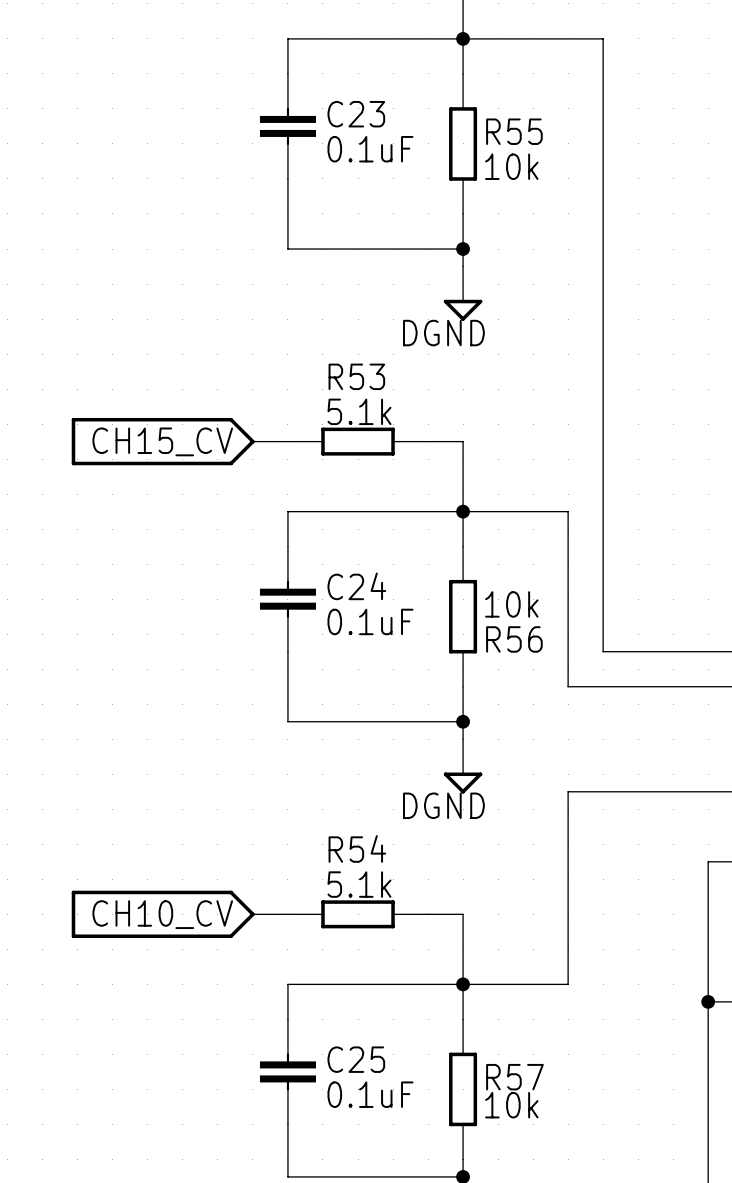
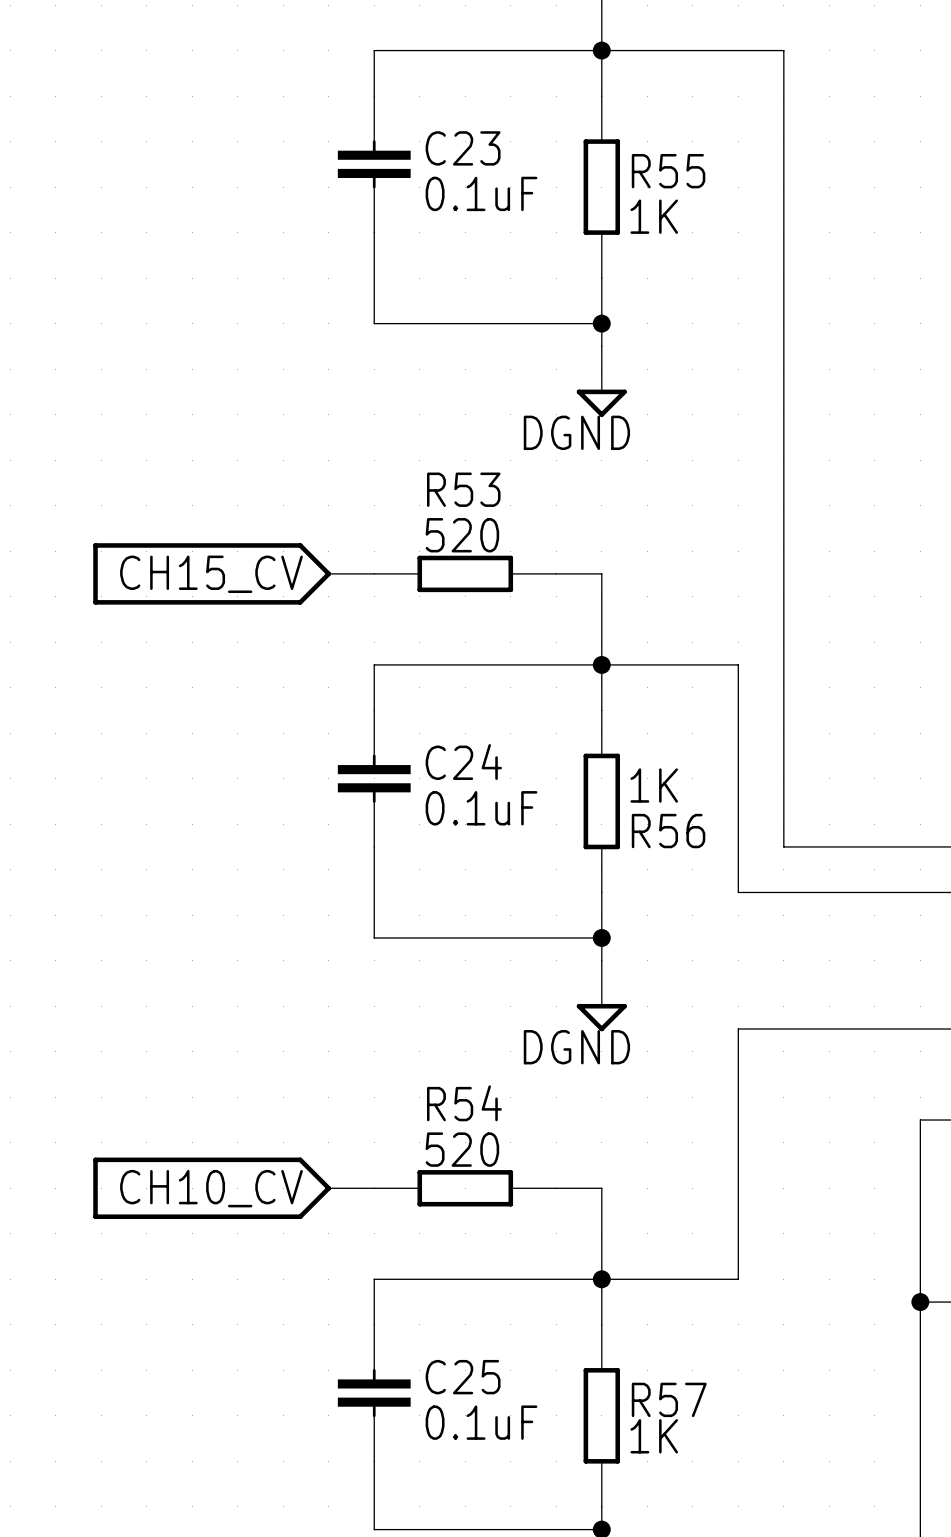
R55 value: 10k (511, 166) -> 1K (654, 216)
R53 value: 5.1k (359, 411) -> 520 (462, 535)
R56 value: 10k (511, 604) -> 1K (654, 785)
R54 value: 5.1k (359, 884) -> 520 (462, 1149)
R57 value: 10k (511, 1105) -> 1K (654, 1436)

